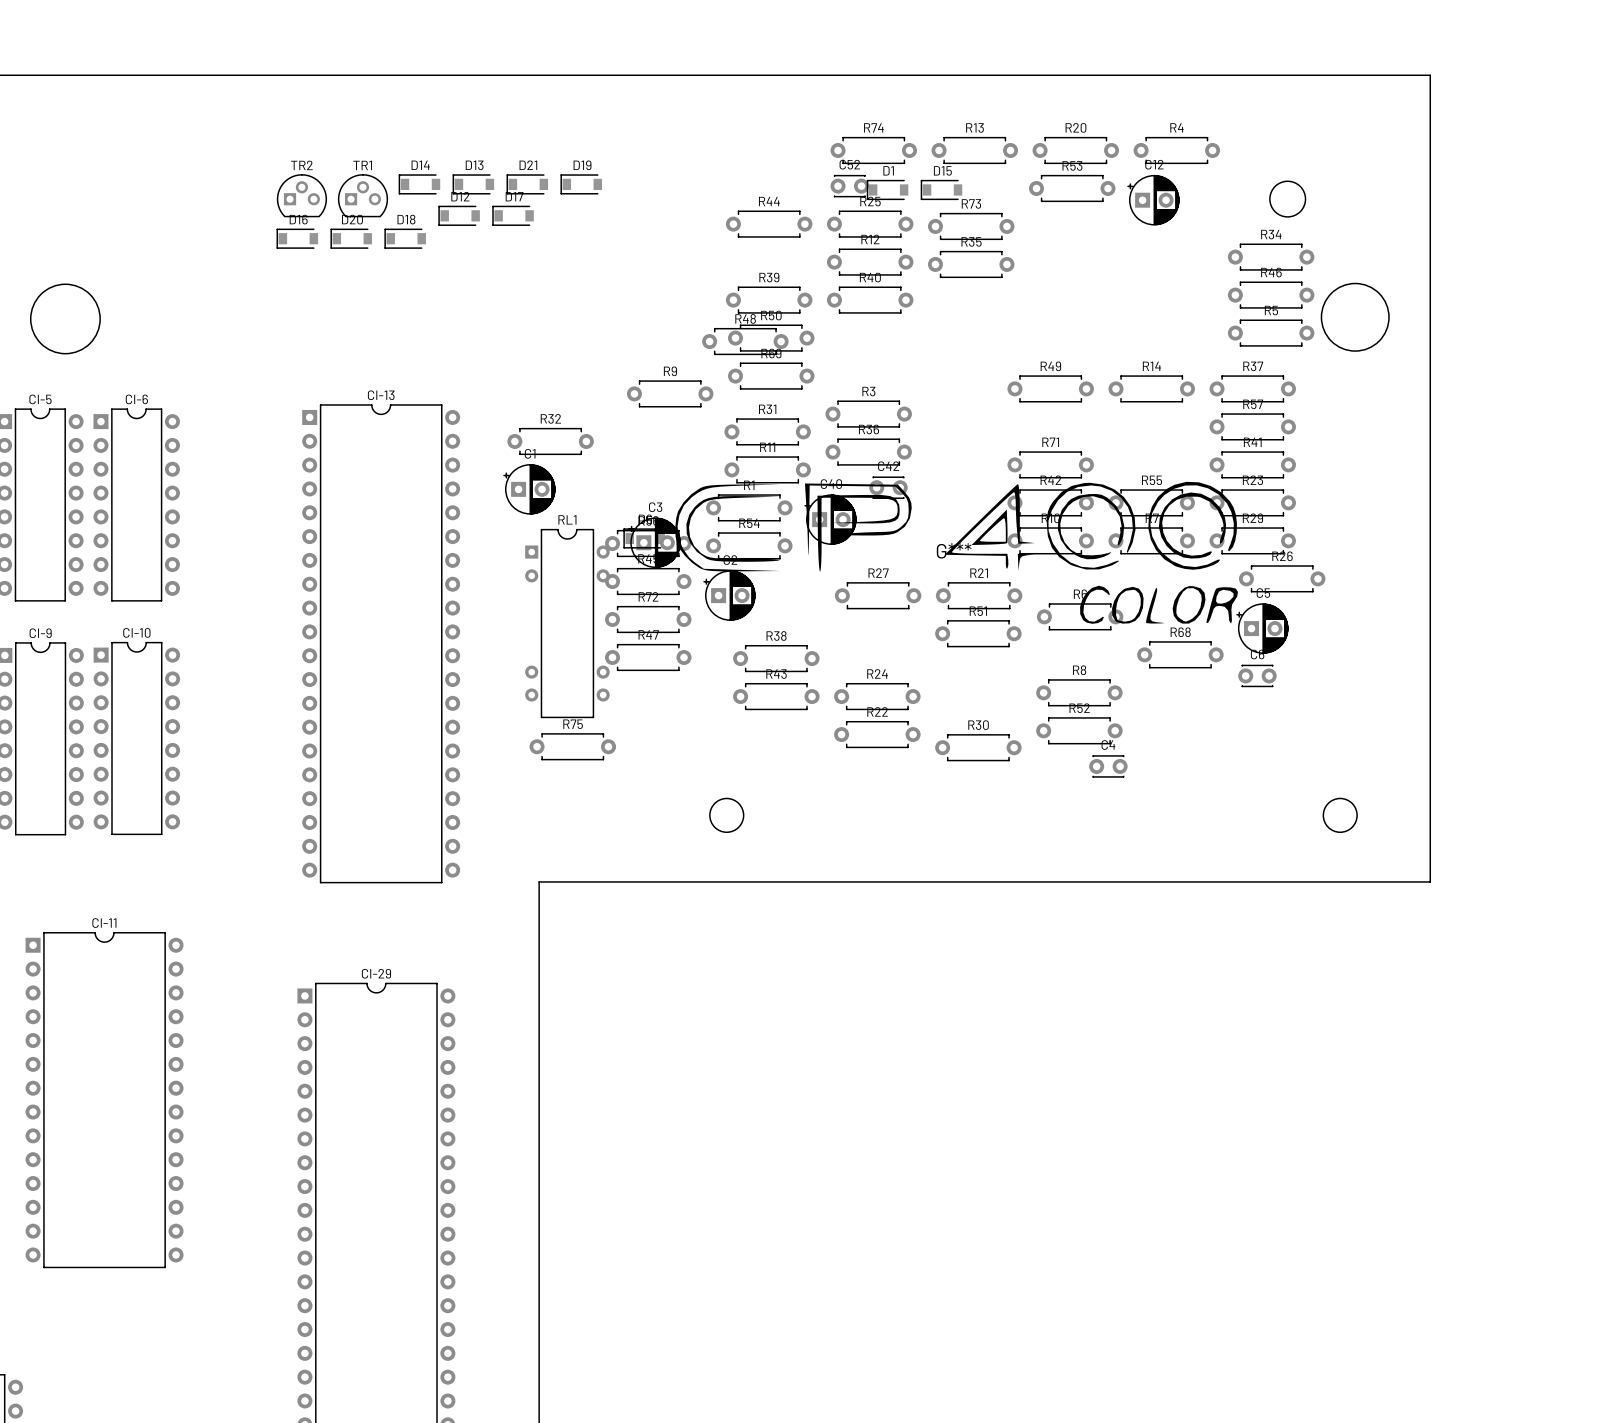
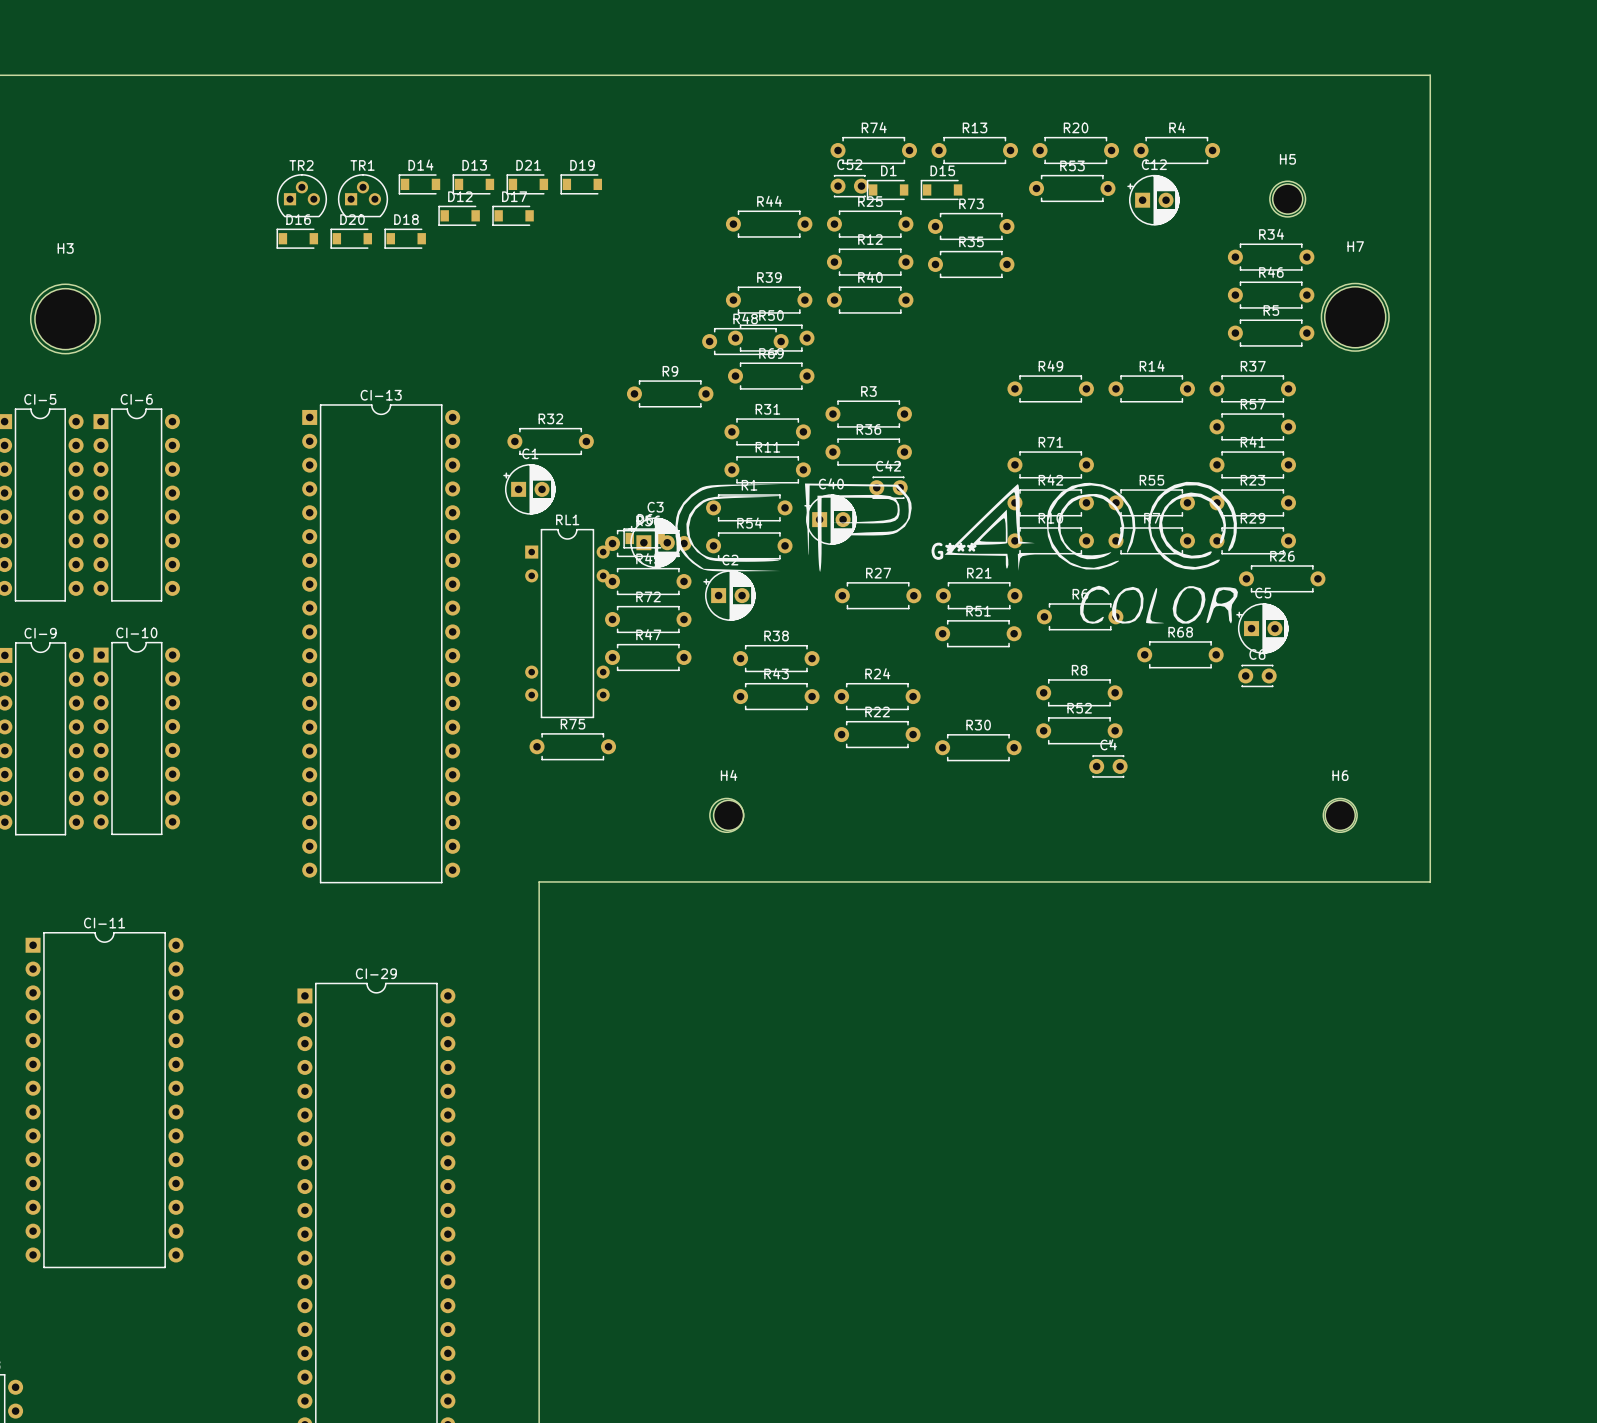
H5: none -> (1287, 199)
H7: none -> (1355, 317)
H3: none -> (65, 319)
H4: none -> (728, 815)
H6: none -> (1340, 815)

